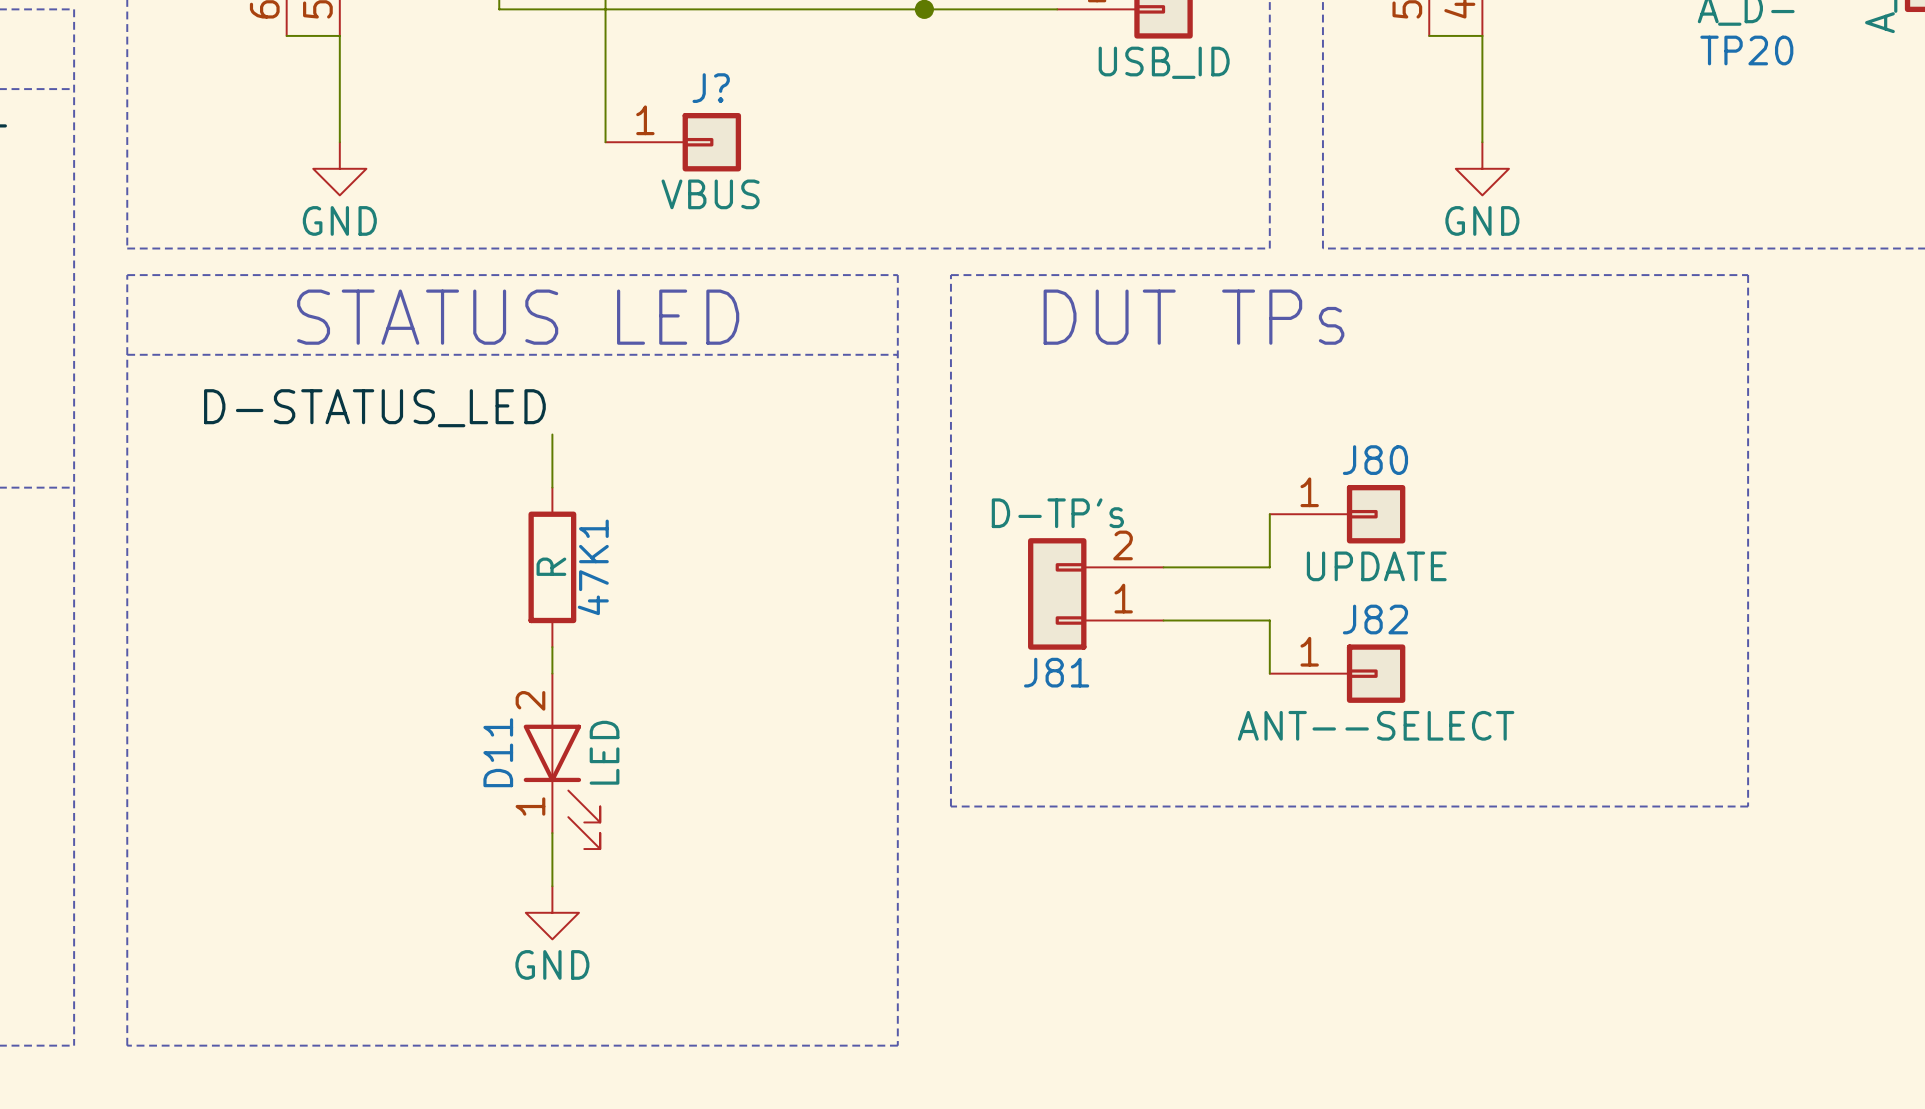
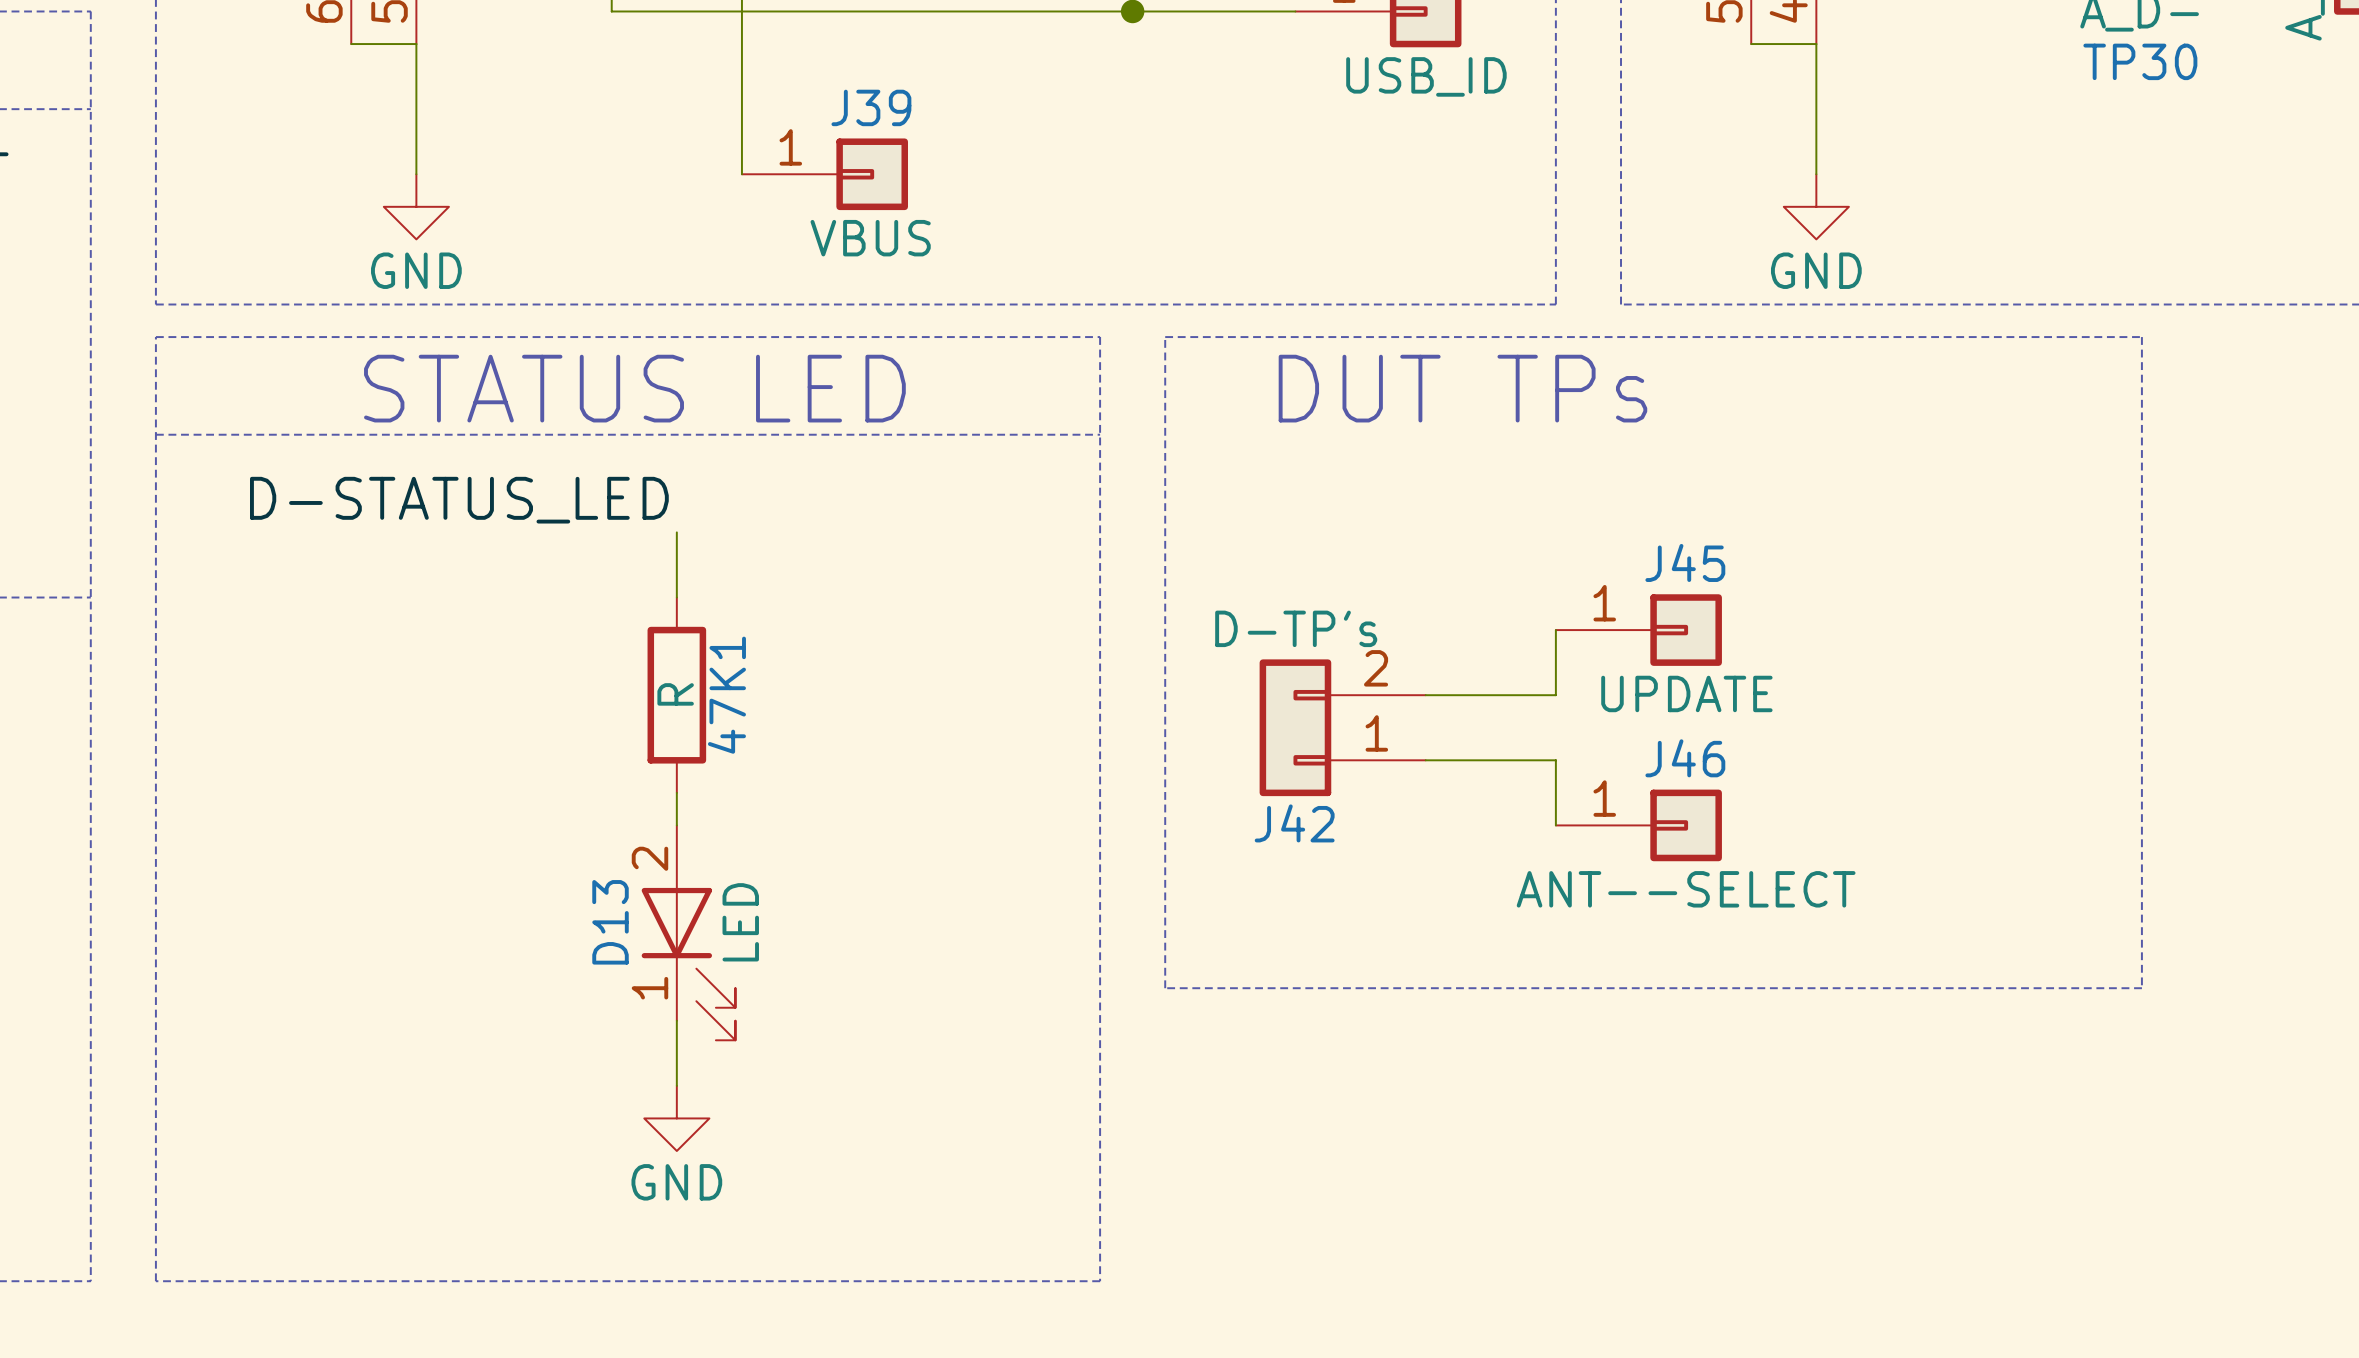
TP20 name: TP20 (1746, 50) -> TP30 (2140, 61)
J? name: J? (711, 88) -> J39 (871, 107)
J80 name: J80 (1375, 460) -> J45 (1685, 562)
J82 name: J82 (1375, 619) -> J46 (1685, 758)
J81 name: J81 (1056, 672) -> J42 (1294, 823)
D11 name: D11 (498, 752) -> D13 (610, 922)

